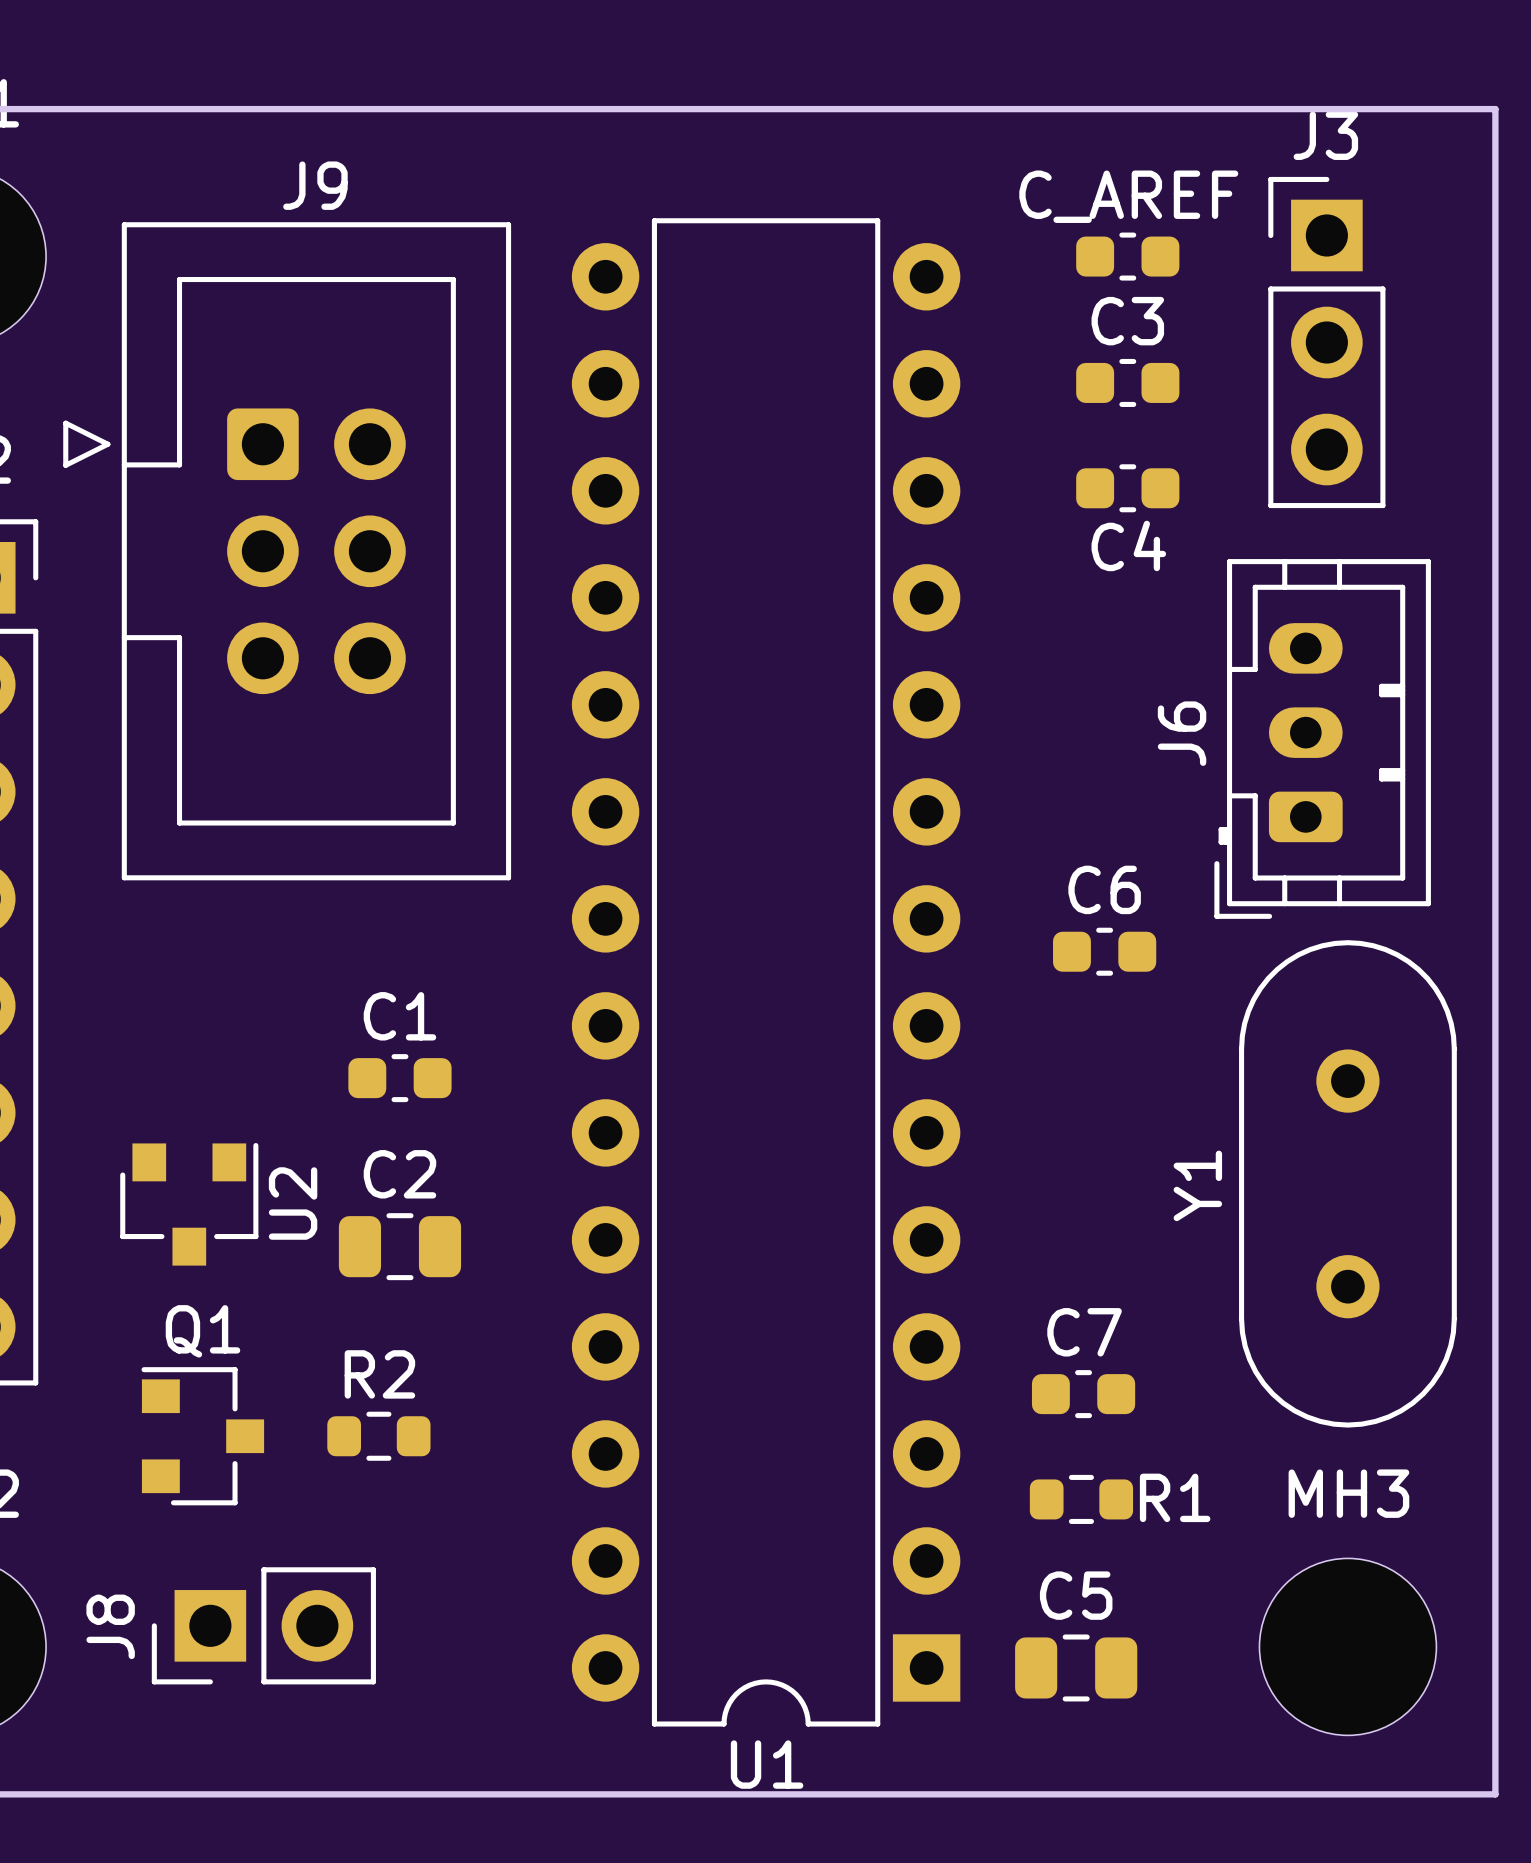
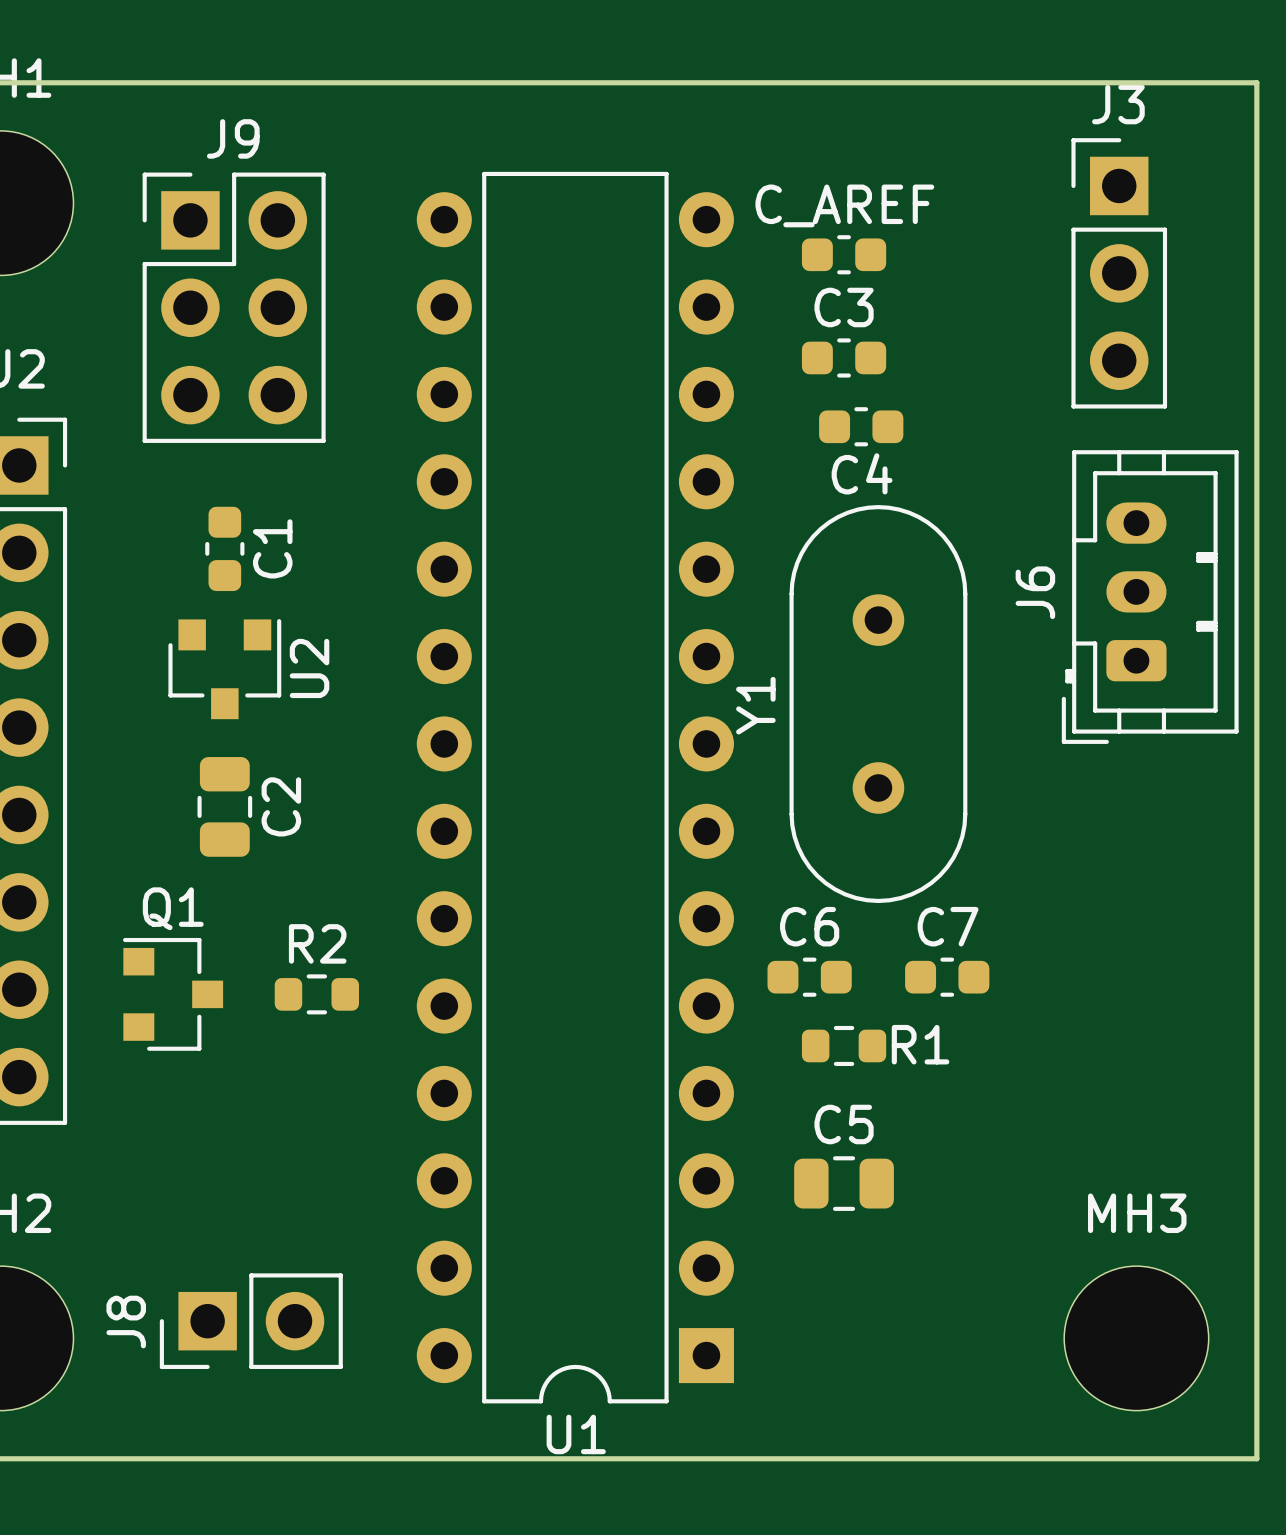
J9 name position: J9 (315, 185) -> J9 (233, 138)
J9 footprint: [63, 222, 512, 881] -> [142, 172, 326, 443]
C_AREF position: (1127, 256) -> (844, 254)
C3 position: (1127, 382) -> (844, 357)
C4 position: (1127, 488) -> (861, 426)
J6 position: (1322, 738) -> (1150, 597)
C6 position: (1104, 951) -> (809, 977)
U1 position: (766, 972) -> (575, 787)
C1 rotation: 0° (399, 1078) -> 90° clockwise (224, 548)
C1 position: (399, 1078) -> (224, 548)
Y1 position: (1347, 1183) -> (878, 704)
U2 position: (189, 1204) -> (224, 669)
C2 rotation: 0° (399, 1246) -> 90° clockwise (224, 806)
C2 position: (399, 1246) -> (224, 806)
C7 position: (1083, 1394) -> (947, 977)
Q1 position: (202, 1436) -> (173, 994)
R2 position: (378, 1436) -> (316, 994)
R1 position: (1081, 1499) -> (844, 1045)
C5 position: (1076, 1667) -> (844, 1183)

